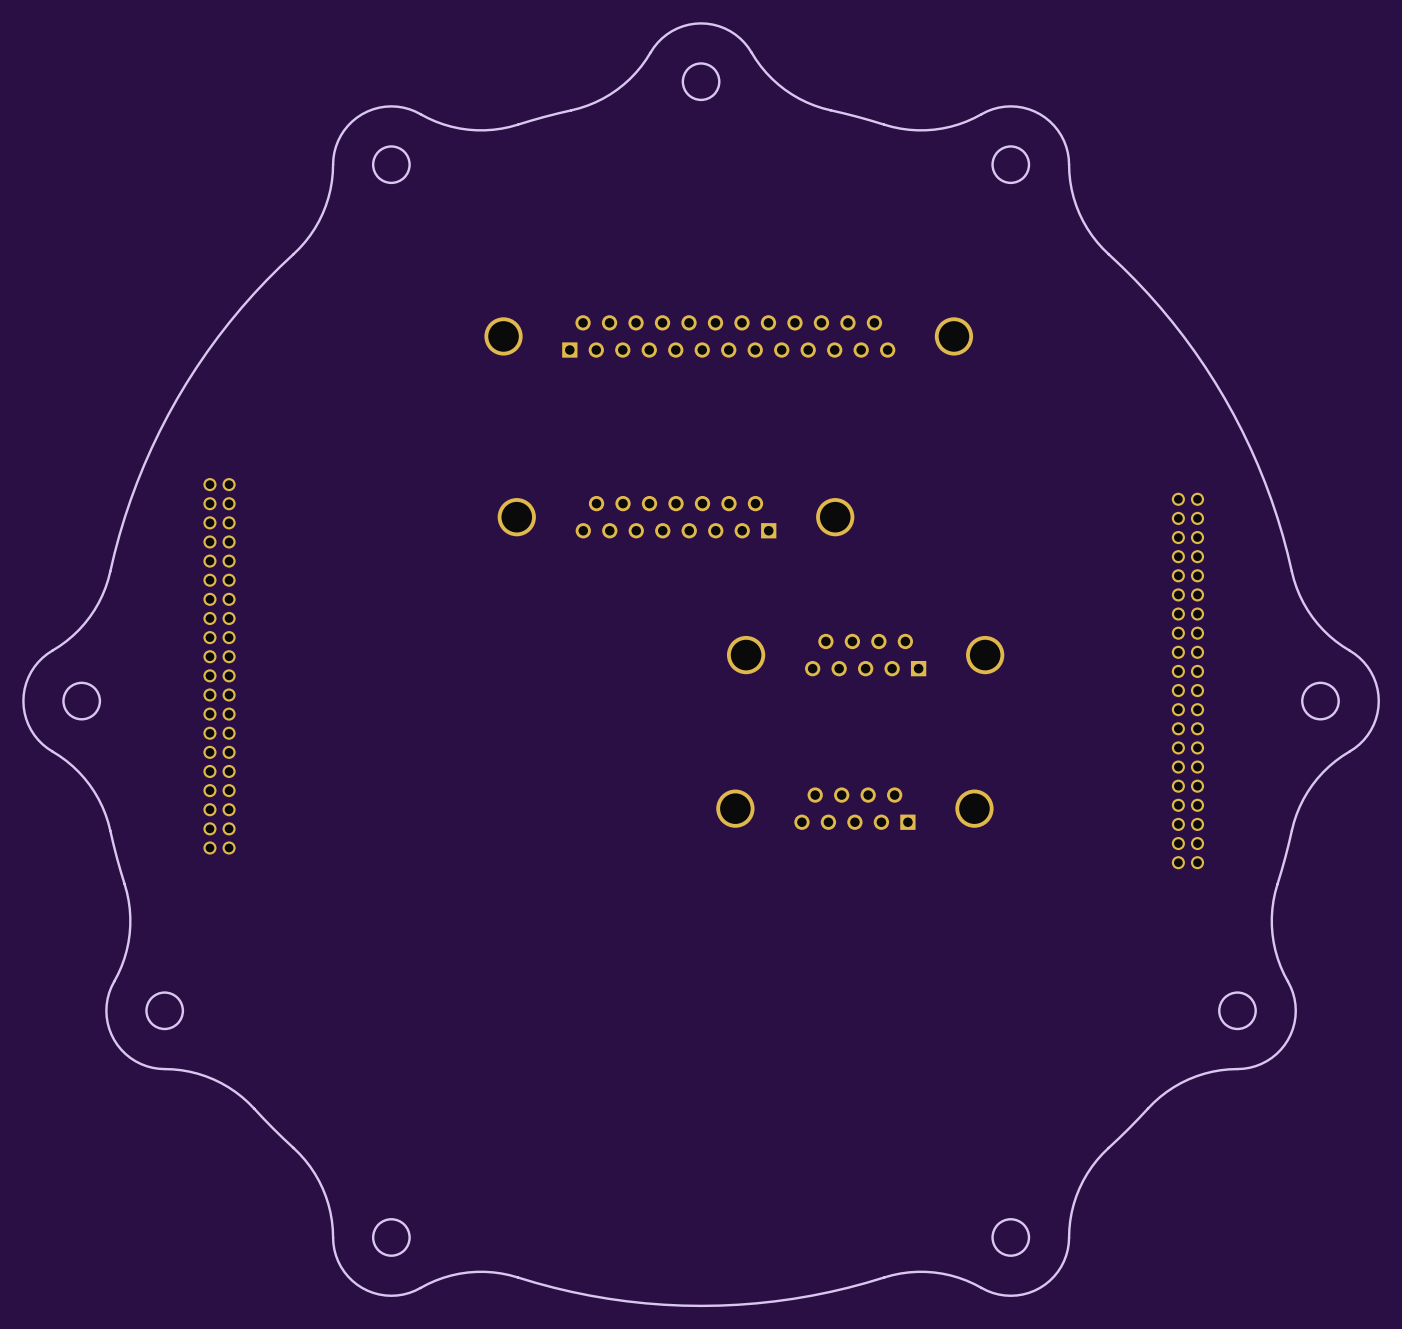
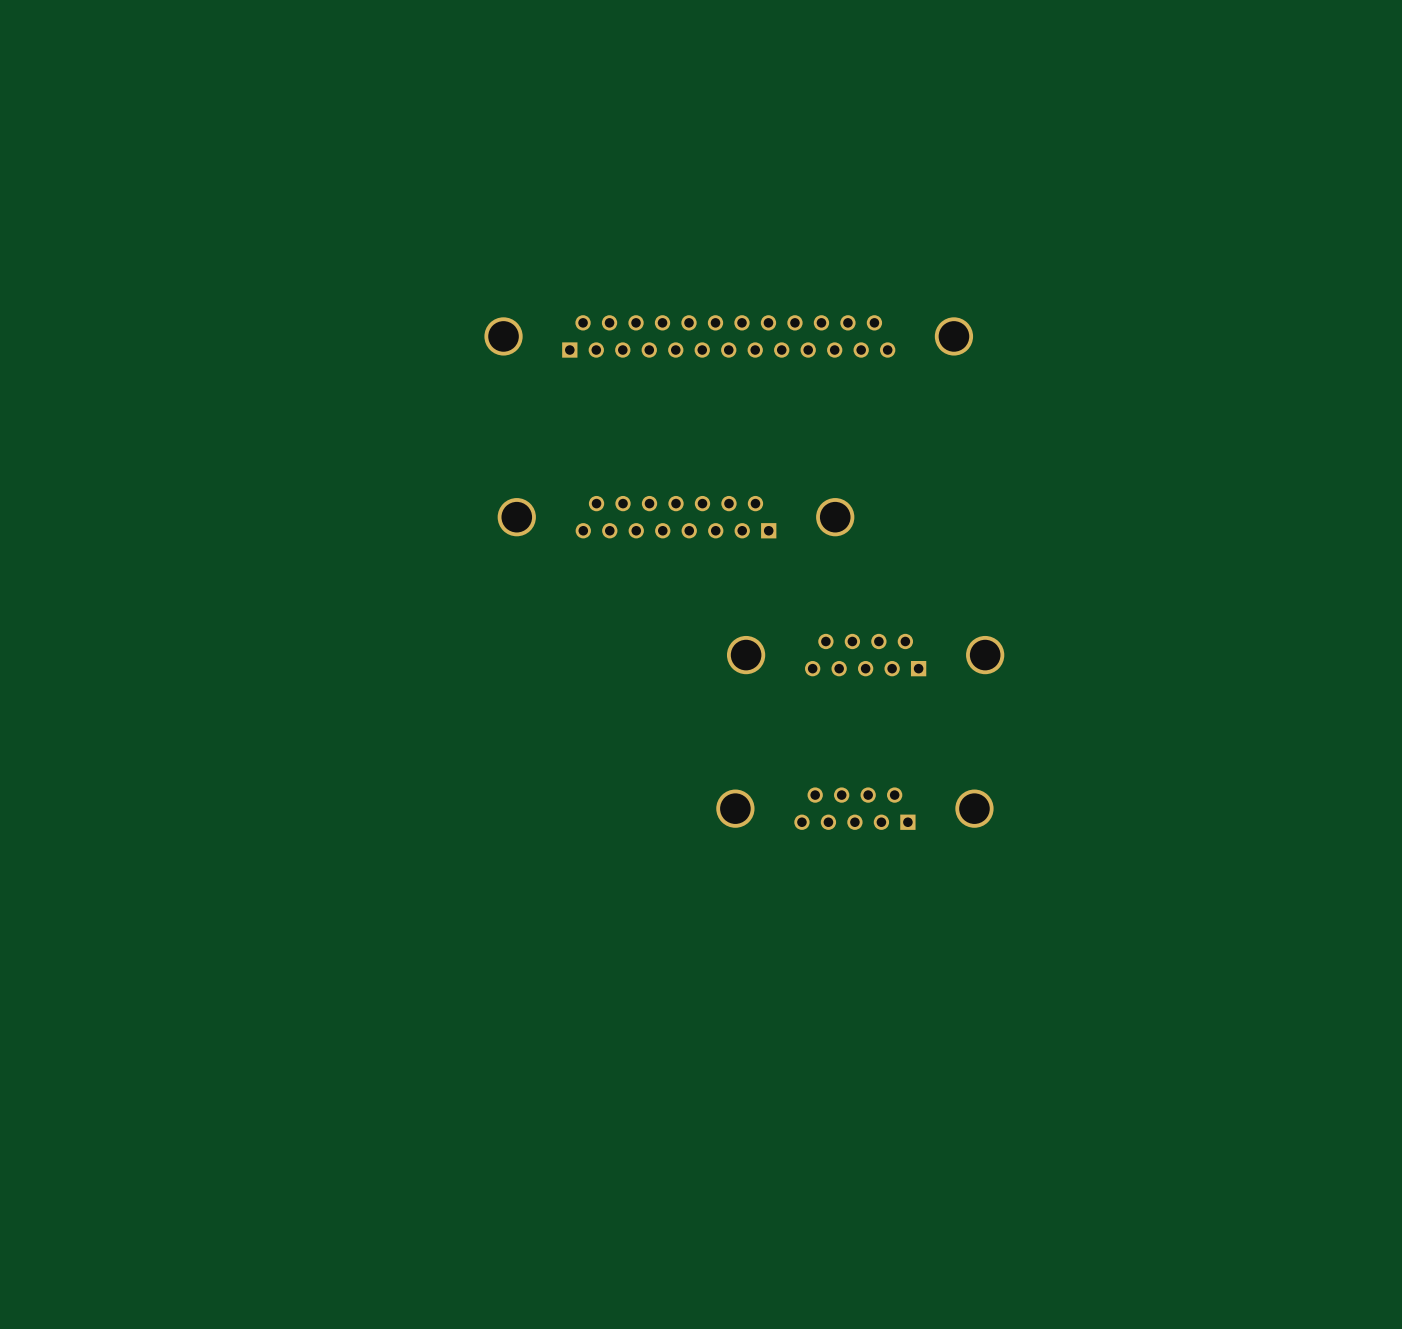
part: (701, 664) -> none

